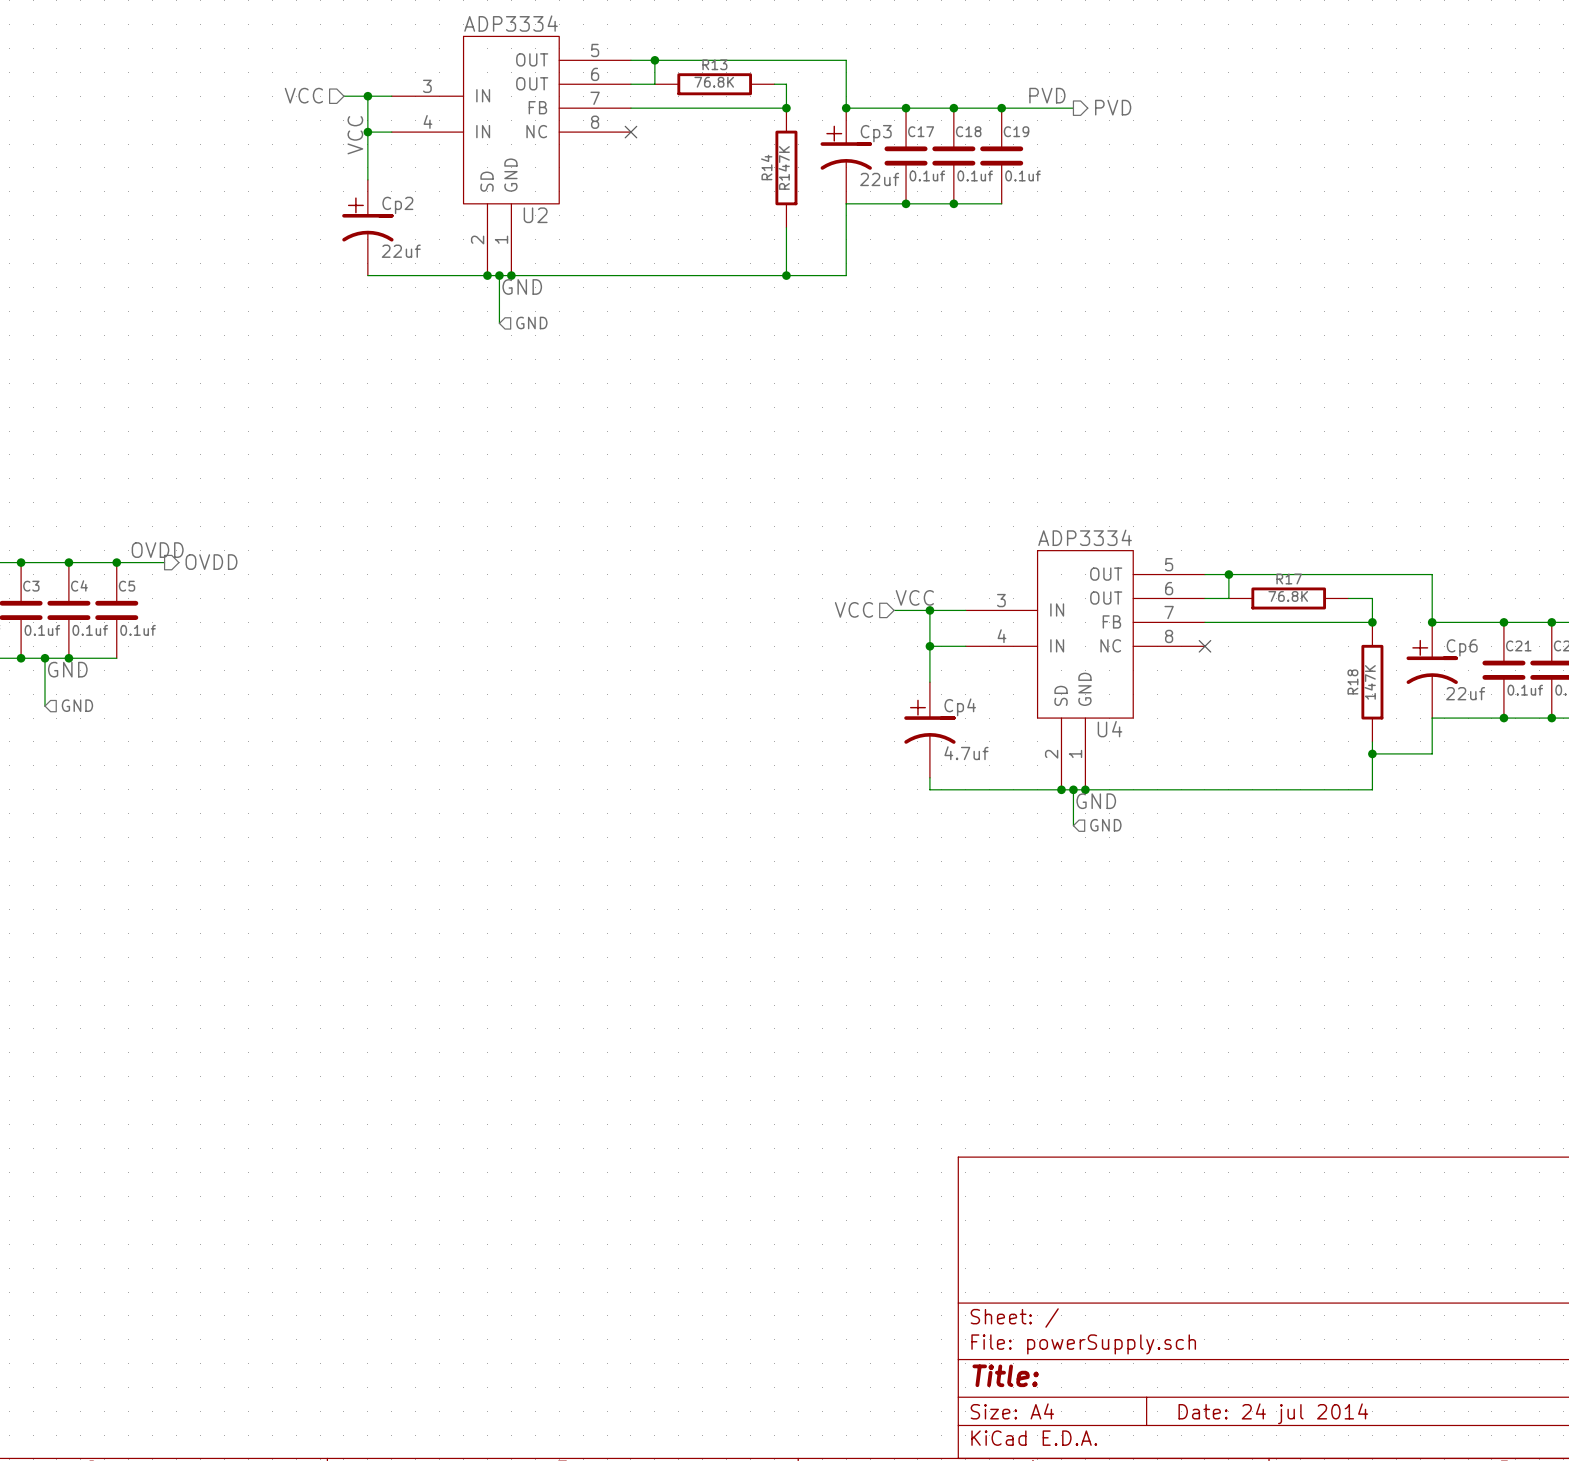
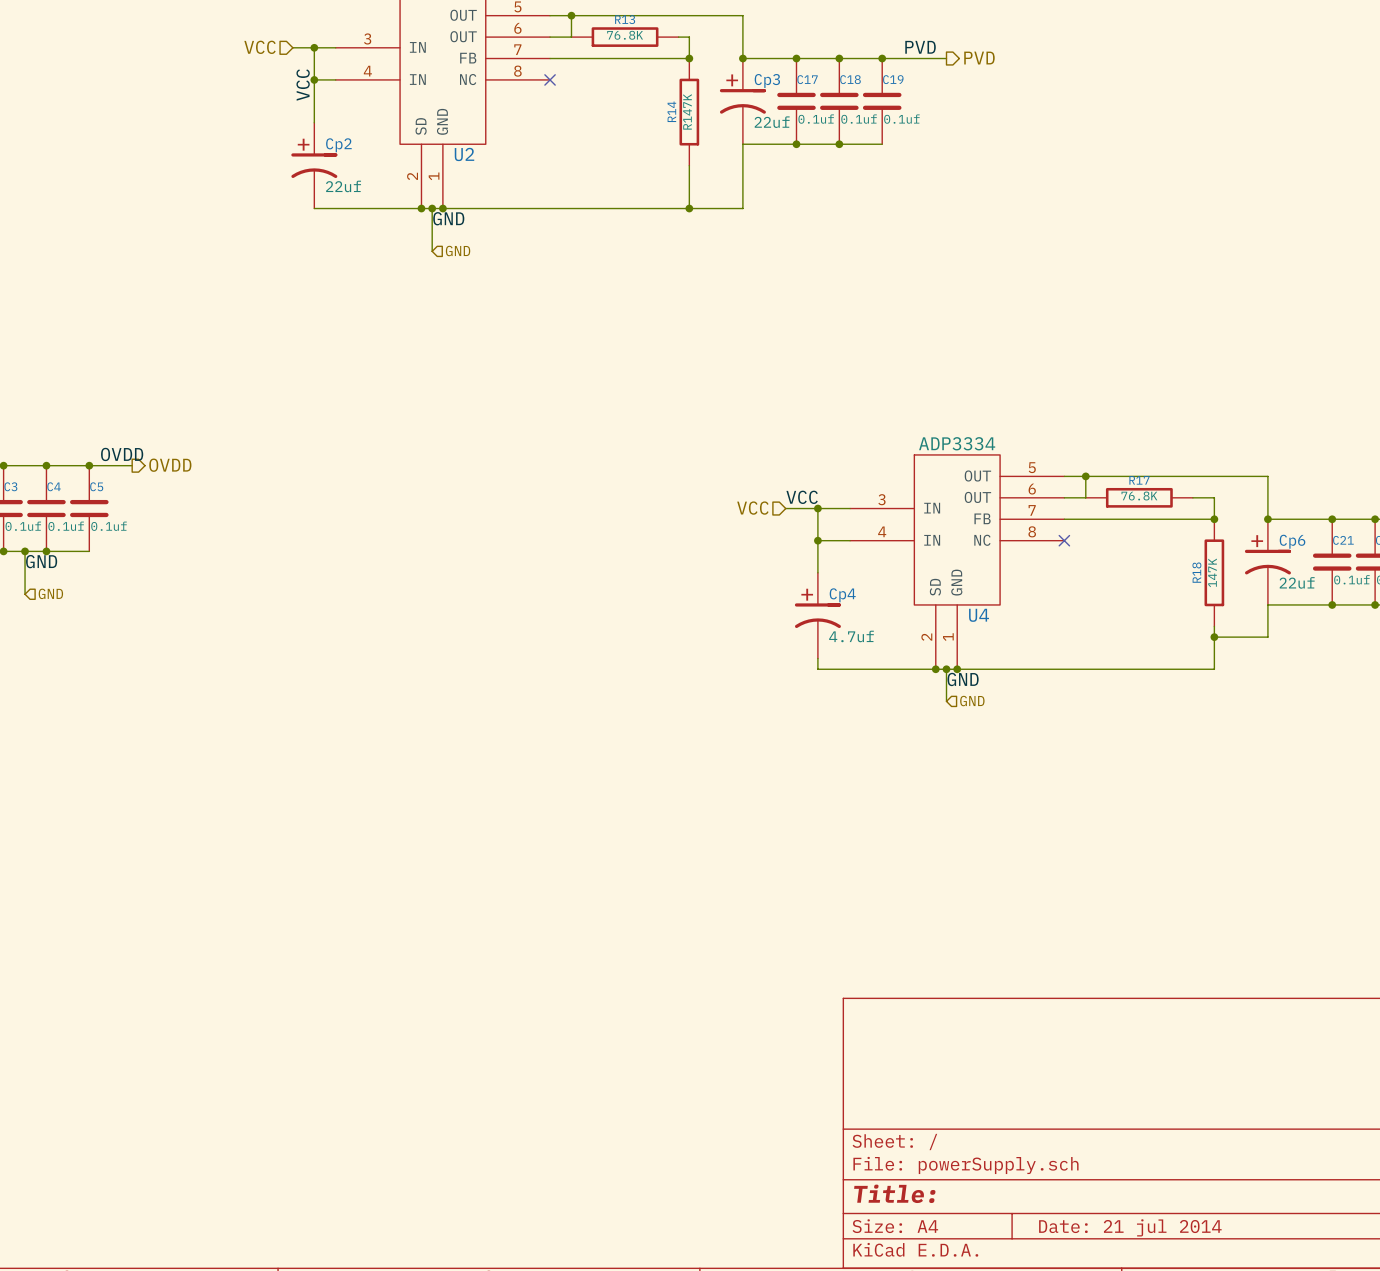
title block: Date: 24 jul 2014 (1273, 1413) -> Date: 21 jul 2014 (1130, 1227)

